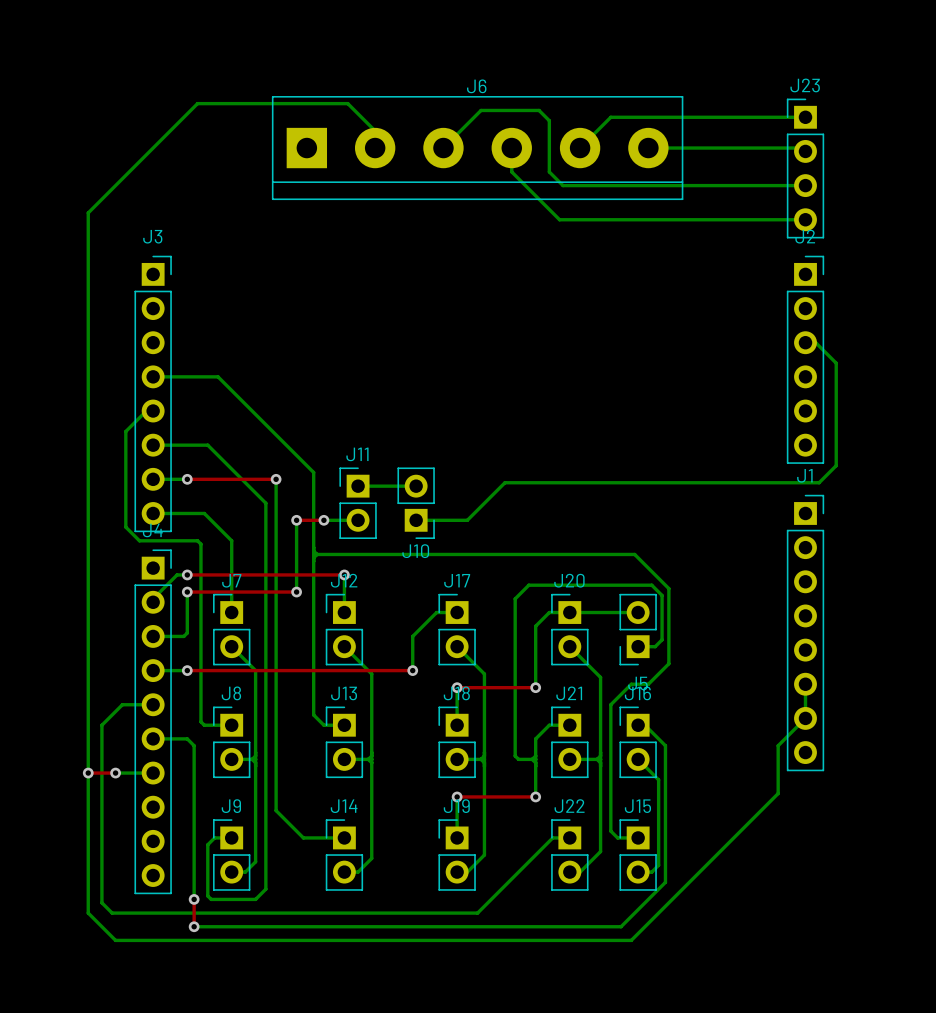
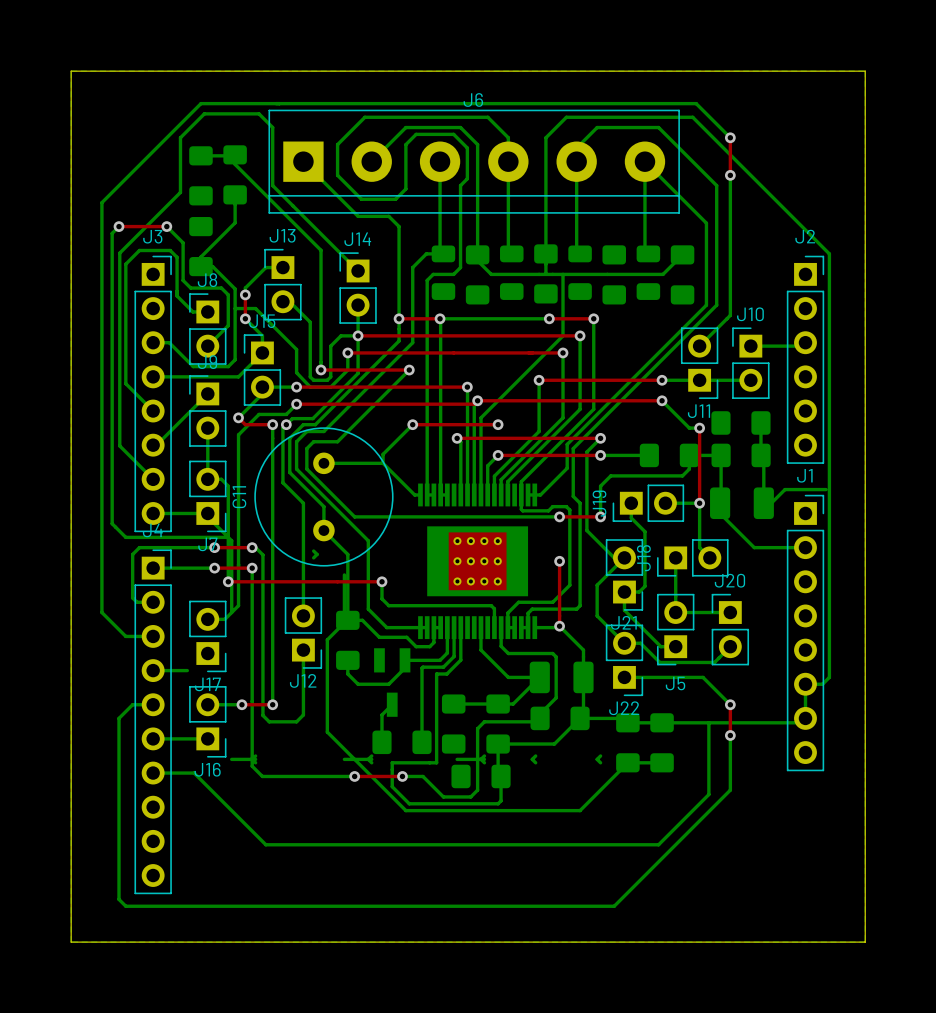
board edge: none -> (71, 71) (71, 942) (865, 942) (865, 71) (71, 71)
bottom track: (200, 103) (197, 103) (88, 212) (88, 913) (115, 940) (631, 940) (778, 793) (778, 745) (801, 722) -> (580, 718) (623, 718) (627, 722) (801, 722)
bottom track: (347, 103) (375, 130) (375, 148) -> (347, 103) (696, 103) (730, 137)
bottom track: (610, 117) (580, 148) -> (610, 117) (566, 117) (545, 137) (545, 274)
bottom track: (692, 117) (805, 117) -> (692, 117) (829, 253) (829, 677) (822, 684) (805, 684)
top track: none -> (730, 137) (730, 175)
via: none -> (730, 137)
bottom track: (443, 148) (481, 110) (539, 110) (549, 120) (549, 171) (563, 185) (805, 185) -> none
J6 position: (477, 148) -> (474, 161)
bottom track: (511, 148) (511, 171) (559, 219) (805, 219) -> none
bottom track: (648, 148) (802, 148) (805, 151) -> none
bottom track: none -> (200, 155) (235, 154) (235, 164) (321, 250) (321, 369)
bottom track: none -> (303, 161) (358, 216) (388, 216) (399, 226) (399, 341) (315, 424) (303, 424) (289, 438) (289, 472) (323, 506) (323, 530) (347, 554) (347, 620)
bottom track: none -> (371, 161) (405, 127) (460, 127) (477, 144) (477, 260) (491, 274) (663, 274) (682, 254)
bottom track: none -> (440, 161) (440, 250) (443, 253) (426, 253) (412, 267) (412, 342) (323, 431) (306, 431) (296, 441) (296, 469) (368, 540) (368, 609) (386, 627) (427, 627)
J23: (805, 168) -> none
part: none -> (235, 174)
part: none -> (200, 175)
bottom track: none -> (730, 175) (730, 315) (699, 346)
via: none -> (730, 175)
bottom track: none -> (235, 194) (235, 222) (200, 257) (200, 266) (212, 266) (235, 288) (235, 359) (228, 366) (193, 366) (169, 342) (153, 342)
bottom track: none -> (119, 226) (112, 233) (112, 523) (125, 537) (228, 537)
top track: none -> (119, 226) (166, 226)
via: none -> (119, 226)
bottom track: none -> (166, 226) (183, 242) (183, 280) (190, 288) (221, 288) (228, 294) (228, 325) (207, 346)
via: none -> (166, 226)
part: none -> (200, 246)
bottom track: none -> (511, 253) (508, 250) (508, 137) (487, 117) (364, 117) (337, 144) (337, 175) (361, 199) (395, 199) (405, 189) (405, 144) (416, 134) (453, 134) (467, 148) (467, 178) (460, 185) (460, 267) (453, 274) (433, 274) (427, 280) (427, 494) (433, 494)
bottom track: none -> (580, 253) (576, 250) (576, 148) (597, 127) (658, 127) (716, 185) (716, 305) (573, 448) (573, 496) (580, 503) (580, 605) (576, 609) (532, 609) (528, 613) (528, 627) (521, 627)
bottom track: none -> (648, 253) (644, 250) (644, 161) (706, 223) (706, 305) (567, 444) (567, 468) (540, 494) (528, 494)
bottom track: none -> (282, 267) (265, 267) (245, 288) (245, 294)
part: none -> (443, 272)
part: none -> (511, 272)
part: none -> (580, 272)
part: none -> (648, 272)
part: none -> (545, 273)
part: none -> (477, 274)
bottom track: none -> (563, 274) (563, 335) (480, 417) (480, 494)
part: none -> (614, 274)
part: none -> (682, 274)
top track: none -> (245, 294) (245, 318)
via: none -> (245, 294)
bottom track: none -> (282, 301) (289, 301) (310, 322) (310, 376) (313, 380) (327, 380) (330, 376) (330, 346) (341, 335) (358, 335)
bottom track: none -> (358, 305) (358, 373) (312, 418) (292, 418) (282, 428) (282, 482) (303, 503) (303, 615)
bottom track: none -> (235, 308) (255, 308) (296, 349) (296, 372) (310, 387) (330, 387) (347, 370) (347, 352)
via: none -> (245, 318)
top track: none -> (399, 318) (440, 318)
via: none -> (399, 318)
via: none -> (440, 318)
bottom track: none -> (549, 318) (440, 318) (440, 494) (447, 494)
top track: none -> (549, 318) (593, 318)
via: none -> (549, 318)
bottom track: none -> (593, 318) (593, 409) (521, 481) (522, 510) (548, 510) (552, 506) (566, 506) (569, 510) (569, 585) (552, 602) (518, 602) (507, 613) (507, 627) (514, 627)
via: none -> (593, 318)
top track: none -> (358, 335) (580, 335)
via: none -> (358, 335)
bottom track: none -> (580, 335) (580, 409) (507, 481) (507, 494)
via: none -> (580, 335)
bottom track: (805, 342) (815, 342) (836, 363) (836, 465) (819, 482) (504, 482) (467, 520) (416, 520) -> (805, 342) (802, 346) (750, 346)
top track: none -> (347, 352) (563, 352)
via: none -> (347, 352)
bottom track: none -> (563, 352) (563, 417) (501, 479) (501, 494)
via: none -> (563, 352)
via: none -> (321, 369)
top track: none -> (321, 370) (409, 370)
bottom track: none -> (409, 370) (337, 441) (313, 441) (306, 448) (306, 469) (354, 516) (559, 516)
via: none -> (409, 370)
bottom track: (218, 376) (313, 472) (313, 714) (323, 725) (344, 725) -> (218, 376) (238, 376) (262, 352) (262, 335) (245, 318)
bottom track: none -> (539, 380) (539, 431) (494, 476) (494, 494)
top track: none -> (539, 380) (662, 380)
via: none -> (539, 380)
bottom track: none -> (662, 380) (750, 380)
via: none -> (662, 380)
bottom track: none -> (296, 387) (262, 387) (262, 393) (238, 417)
top track: none -> (296, 387) (467, 387)
via: none -> (296, 387)
bottom track: none -> (467, 387) (467, 494)
via: none -> (467, 387)
bottom track: none -> (477, 400) (474, 404) (474, 494)
via: none -> (477, 400)
bottom track: none -> (662, 400) (689, 428) (699, 428)
top track: none -> (662, 400) (477, 400) (474, 404) (296, 404)
via: none -> (662, 400)
bottom track: none -> (296, 404) (286, 414) (259, 414) (238, 434) (238, 605) (224, 619) (207, 619)
via: none -> (296, 404)
bottom track: (153, 411) (146, 411) (125, 431) (125, 527) (139, 540) (197, 540) (200, 544) (200, 721) (204, 725) (231, 725) -> (153, 411) (125, 383) (125, 264) (139, 250) (170, 250) (177, 257) (177, 296) (193, 311) (207, 311)
top track: none -> (238, 417) (245, 424) (272, 424)
via: none -> (238, 417)
part: none -> (740, 422)
bottom track: none -> (760, 422) (760, 455) (763, 458) (763, 503) (771, 503) (785, 489) (825, 489)
bottom track: none -> (272, 424) (272, 704)
via: none -> (272, 424)
via: none -> (286, 424)
bottom track: none -> (412, 424) (383, 454) (383, 463)
top track: none -> (412, 424) (498, 424)
via: none -> (412, 424)
via: none -> (498, 424)
bottom track: none -> (207, 428) (207, 479) (221, 479) (228, 486) (228, 581)
top track: none -> (699, 428) (699, 503)
via: none -> (699, 428)
bottom track: none -> (457, 438) (460, 442) (460, 494)
top track: none -> (457, 438) (600, 438)
via: none -> (457, 438)
bottom track: none -> (600, 438) (586, 452) (586, 530) (614, 557) (624, 557) (597, 585) (597, 615) (624, 643) (640, 643) (659, 662) (714, 662) (730, 646)
via: none -> (600, 438)
bottom track: (156, 445) (207, 445) (265, 503) (265, 889) (255, 899) (211, 899) (207, 896) (207, 844) (214, 837) (231, 837) -> (156, 445) (207, 393)
bottom track: none -> (498, 455) (487, 465) (487, 494)
top track: none -> (498, 455) (600, 455)
via: none -> (498, 455)
bottom track: none -> (600, 455) (649, 455)
via: none -> (600, 455)
part: none -> (669, 455)
part: none -> (741, 455)
bottom track: none -> (323, 463) (383, 463)
bottom track: none -> (383, 463) (414, 494) (420, 494)
bottom track: (153, 479) (187, 479) -> (153, 479) (119, 445) (119, 253) (180, 192) (180, 137) (204, 113) (259, 113) (272, 127) (272, 185) (358, 270)
top track: (187, 479) (276, 479) -> none
via: (187, 479) -> none
bottom track: (276, 479) (276, 810) (303, 837) (344, 837) -> none
via: (276, 479) -> none
bottom track: (358, 486) (416, 486) -> none
C11: none -> (323, 496)
J11 rotation: 0° (358, 503) -> 180° (699, 363)
J11 position: (358, 503) -> (699, 363)
J10 rotation: 0° (416, 503) -> 180° (750, 363)
J10 position: (416, 503) -> (750, 363)
bottom track: none -> (631, 503) (631, 518) (644, 531) (644, 586) (639, 592) (624, 592) (624, 610) (660, 646) (675, 646)
bottom track: none -> (665, 503) (699, 503) (699, 547) (709, 557)
via: none -> (699, 503)
part: none -> (741, 503)
top track: none -> (559, 516) (600, 516)
via: none -> (559, 516)
bottom track: none -> (600, 516) (600, 486) (610, 475) (682, 475) (689, 469) (689, 455) (721, 455) (720, 513) (754, 547) (805, 547)
via: none -> (600, 516)
bottom track: (296, 520) (296, 592) -> none
top track: (296, 520) (323, 520) -> none
via: (296, 520) -> none
bottom track: (323, 520) (358, 520) -> (207, 704) (241, 704)
via: (323, 520) -> none
top track: none -> (214, 547) (252, 547)
via: none -> (214, 547)
bottom track: none -> (252, 547) (255, 547) (262, 554) (262, 715) (269, 721) (296, 721) (303, 714) (303, 650)
via: none -> (252, 547)
bottom track: (313, 554) (634, 554) (668, 588) (668, 663) (648, 684) (631, 684) (610, 704) (610, 831) (617, 837) (638, 837) -> none
bottom track: none -> (675, 557) (675, 612) (730, 612)
part: none -> (477, 561)
top track: none -> (559, 561) (559, 626)
via: none -> (559, 561)
bottom track: none -> (153, 568) (214, 568)
top track: none -> (214, 568) (252, 568)
via: none -> (214, 568)
bottom track: none -> (252, 568) (252, 766) (262, 776) (354, 776)
via: none -> (252, 568)
bottom track: (187, 574) (177, 574) (153, 598) (153, 602) -> (214, 547) (139, 547) (132, 554) (132, 597) (136, 602) (153, 602)
top track: (187, 574) (344, 574) -> none
via: (187, 574) -> none
via position: (344, 574) -> (381, 581)
top track: none -> (228, 581) (381, 581)
via: none -> (228, 581)
bottom track: none -> (381, 581) (381, 598) (388, 605) (491, 605) (494, 608) (494, 627)
bottom track: (187, 592) (187, 633) (183, 636) (153, 636) -> (200, 103) (101, 202) (101, 612) (125, 636) (153, 636)
top track: (187, 592) (296, 592) -> none
via: (187, 592) -> none
via: (296, 592) -> none
bottom track: (457, 612) (436, 612) (412, 636) (412, 670) -> none
bottom track: (638, 612) (549, 612) (535, 626) (535, 687) -> none
via: none -> (559, 626)
bottom track: none -> (440, 627) (433, 627) (433, 642) (429, 646) (416, 646) (406, 637) (379, 637) (362, 620) (346, 620) (327, 639) (327, 732) (405, 810) (580, 810) (627, 762) (662, 762)
bottom track: none -> (447, 627) (447, 653) (440, 660) (405, 660) (405, 668) (388, 684) (358, 684) (347, 674) (347, 660)
bottom track: none -> (454, 627) (454, 656) (443, 667) (421, 668) (421, 742)
bottom track: none -> (460, 627) (460, 660) (446, 674) (436, 674) (436, 762) (392, 762) (392, 786) (409, 803) (498, 803) (501, 800) (501, 776) (498, 773) (498, 744) (554, 744) (583, 714) (583, 650) (559, 626) (534, 627)
bottom track: none -> (480, 627) (480, 650) (508, 677) (539, 677) (513, 704) (453, 704)
bottom track: none -> (501, 627) (501, 646) (508, 653) (552, 653) (556, 656) (556, 697) (540, 714) (540, 718) (536, 721) (484, 721) (477, 728) (477, 790) (470, 796) (443, 796) (422, 776) (402, 776)
J7 rotation: 0° (231, 629) -> 180° (207, 496)
J7 position: (231, 629) -> (207, 496)
J12 rotation: 0° (344, 629) -> 180° (303, 633)
J17 rotation: 0° (457, 629) -> 180° (207, 636)
J17 position: (457, 629) -> (207, 636)
J20 position: (569, 629) -> (730, 629)
J5 position: (638, 629) -> (675, 629)
part: none -> (347, 640)
bottom track: (231, 646) (255, 670) (255, 861) (245, 872) (231, 872) -> none
bottom track: (344, 646) (371, 674) (371, 858) (358, 872) (344, 872) -> none
bottom track: (457, 646) (484, 674) (484, 855) (467, 872) (457, 872) -> none
bottom track: (569, 646) (600, 677) (600, 851) (580, 872) (569, 872) -> none
bottom track: (638, 646) (655, 646) (662, 639) (662, 595) (651, 585) (528, 585) (515, 598) (515, 755) (518, 759) (535, 759) -> none
top track: (187, 670) (412, 670) -> none
via: (187, 670) -> none
via: (412, 670) -> none
part: none -> (561, 677)
bottom track: none -> (624, 677) (703, 677) (730, 704)
part: none -> (392, 682)
bottom track: (457, 687) (457, 725) -> none
top track: (457, 687) (535, 687) -> none
via: (457, 687) -> none
via: (535, 687) -> none
bottom track: (132, 704) (122, 704) (101, 725) (101, 902) (112, 913) (477, 913) (552, 837) (569, 837) -> (132, 704) (119, 718) (119, 899) (125, 906) (614, 906) (730, 790) (730, 735)
top track: none -> (241, 704) (272, 704)
via: none -> (241, 704)
via: none -> (272, 704)
bottom track: none -> (392, 704) (381, 714) (381, 742)
top track: none -> (730, 704) (730, 735)
via: none -> (730, 704)
part: none -> (560, 718)
part: none -> (453, 724)
part: none -> (498, 724)
bottom track: (569, 725) (549, 725) (535, 738) (535, 796) -> none
bottom track: (638, 725) (644, 725) (665, 745) (665, 882) (621, 926) (194, 926) -> none
via: none -> (730, 735)
bottom track: (187, 738) (194, 745) (194, 899) -> (187, 738) (200, 738)
J8 position: (231, 742) -> (207, 329)
J13 position: (344, 742) -> (282, 284)
part: none -> (401, 742)
J18 rotation: 0° (457, 742) -> 90° counterclockwise (692, 557)
J18 position: (457, 742) -> (692, 557)
J21 rotation: 0° (569, 742) -> 180° (624, 574)
J21 position: (569, 742) -> (624, 574)
part: none -> (627, 742)
J16 rotation: 0° (638, 742) -> 180° (207, 721)
J16 position: (638, 742) -> (207, 721)
part: none -> (662, 742)
bottom track: (569, 759) (600, 759) -> none
bottom track: (638, 759) (658, 779) (658, 865) (651, 872) (638, 872) -> none
top track: (88, 773) (115, 773) -> none
via: (88, 773) -> none
bottom track: (115, 773) (153, 773) -> (708, 722) (708, 794) (658, 844) (265, 844) (194, 773) (153, 773)
via: (115, 773) -> none
top track: none -> (354, 776) (402, 776)
via: none -> (354, 776)
via: none -> (402, 776)
part: none -> (481, 776)
bottom track: (457, 796) (457, 837) -> none
top track: (457, 796) (535, 796) -> none
via: (457, 796) -> none
via: (535, 796) -> none
J9 position: (231, 855) -> (207, 411)
J14 position: (344, 855) -> (358, 288)
J19 rotation: 0° (457, 855) -> 90° counterclockwise (648, 503)
J19 position: (457, 855) -> (648, 503)
J22 rotation: 0° (569, 855) -> 180° (624, 660)
J22 position: (569, 855) -> (624, 660)
J15 position: (638, 855) -> (262, 370)
top track: (194, 899) (194, 926) -> none
via: (194, 899) -> none
via: (194, 926) -> none

